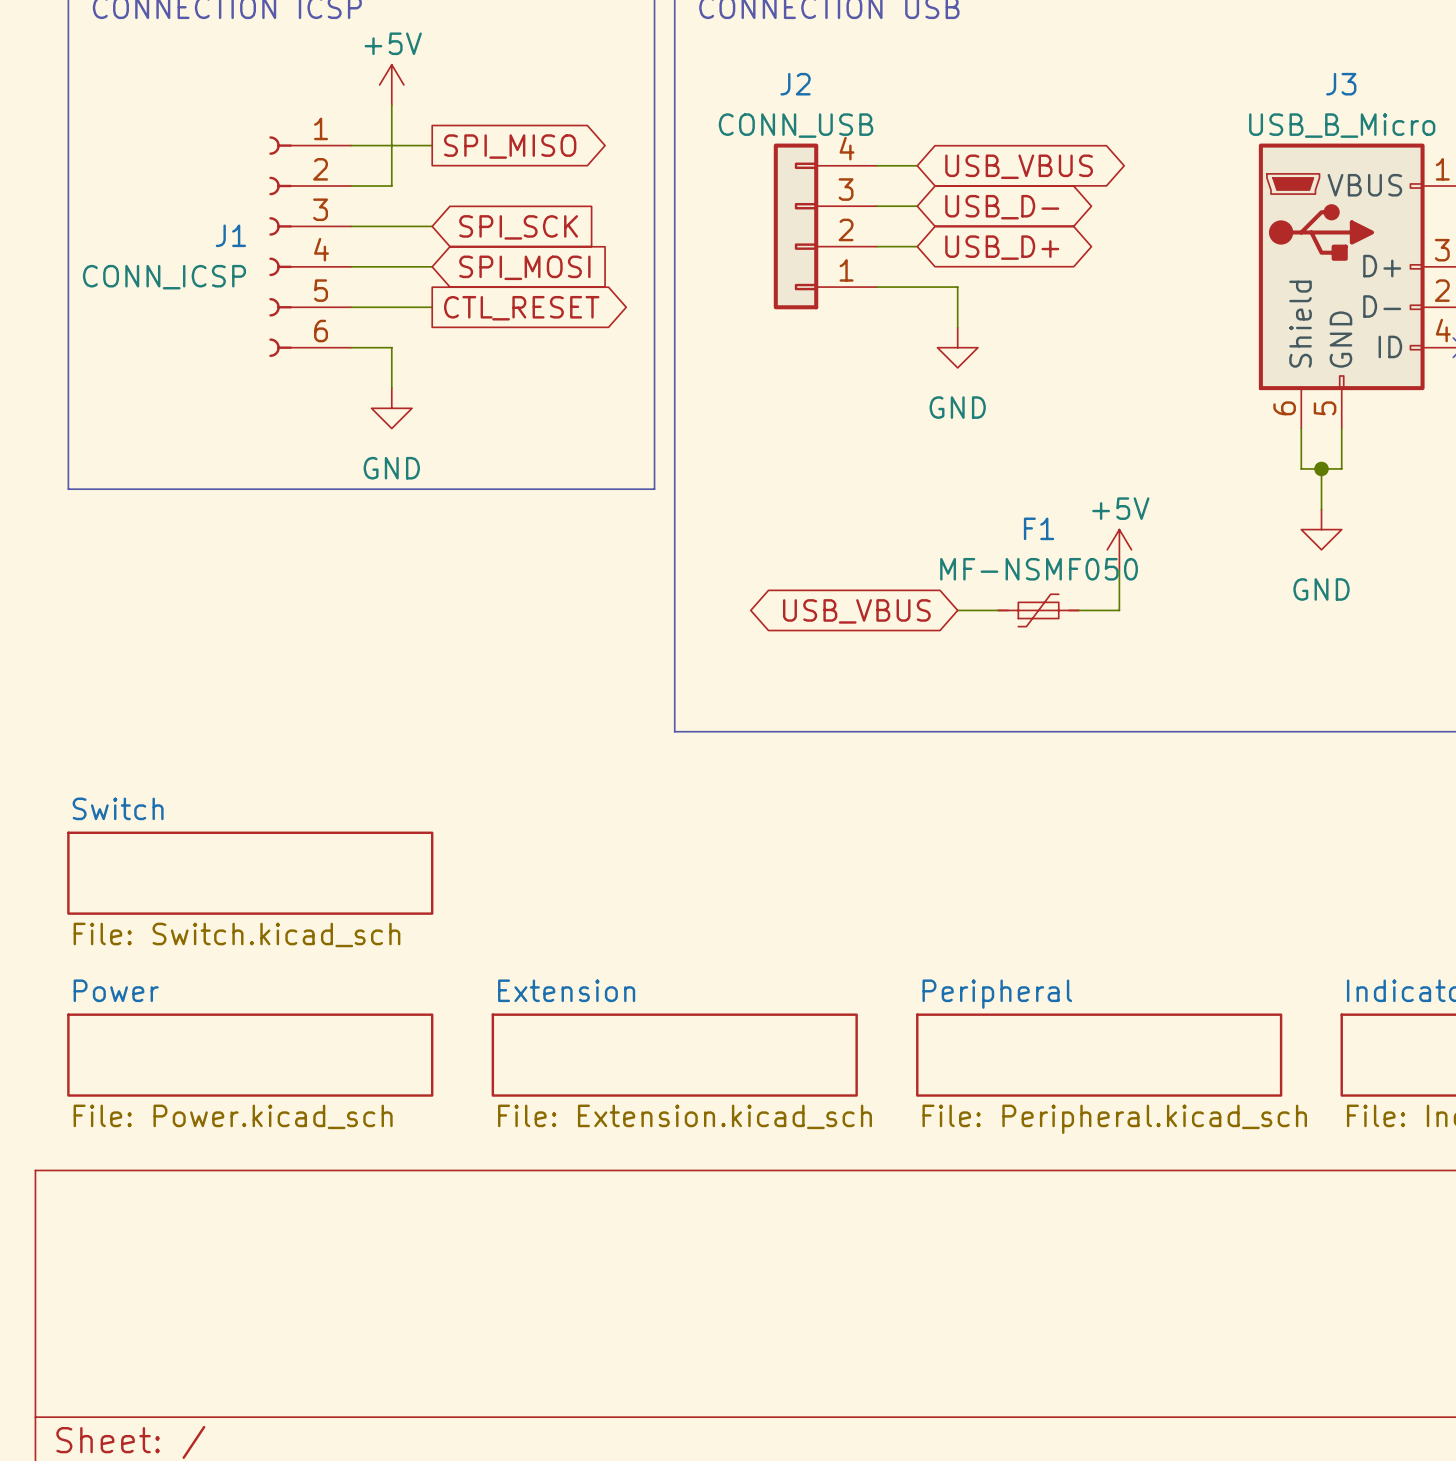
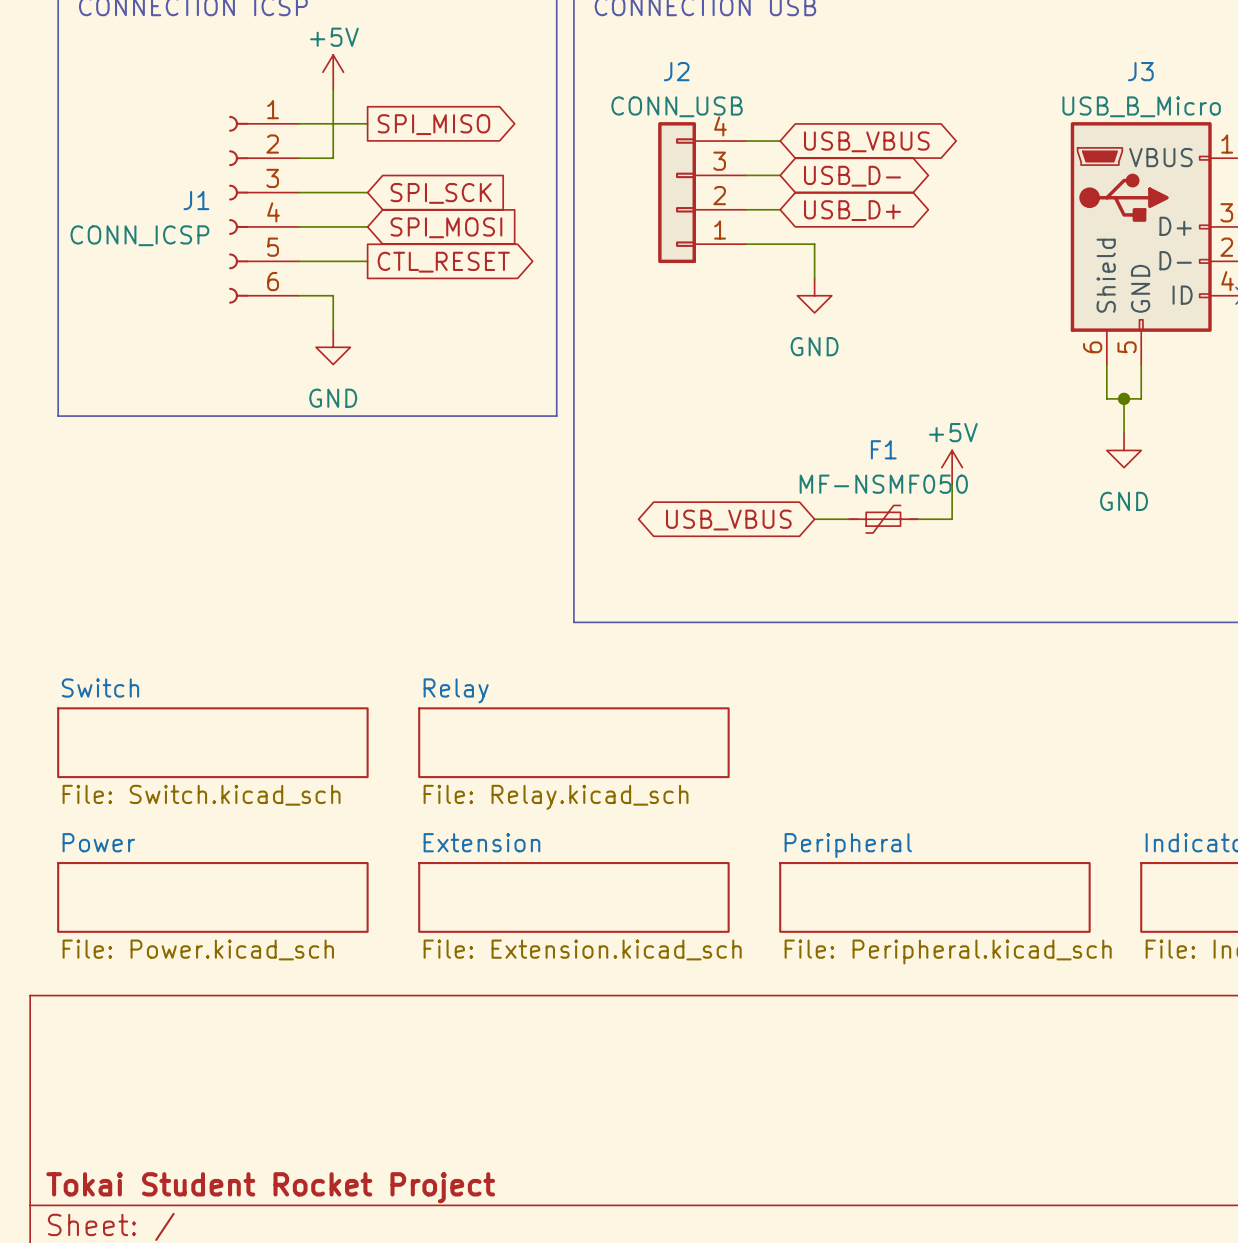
sheet Relay: none -> File: Relay.kicad_sch (573, 742)
title block: none -> Tokai Student Rocket Project (270, 1187)

